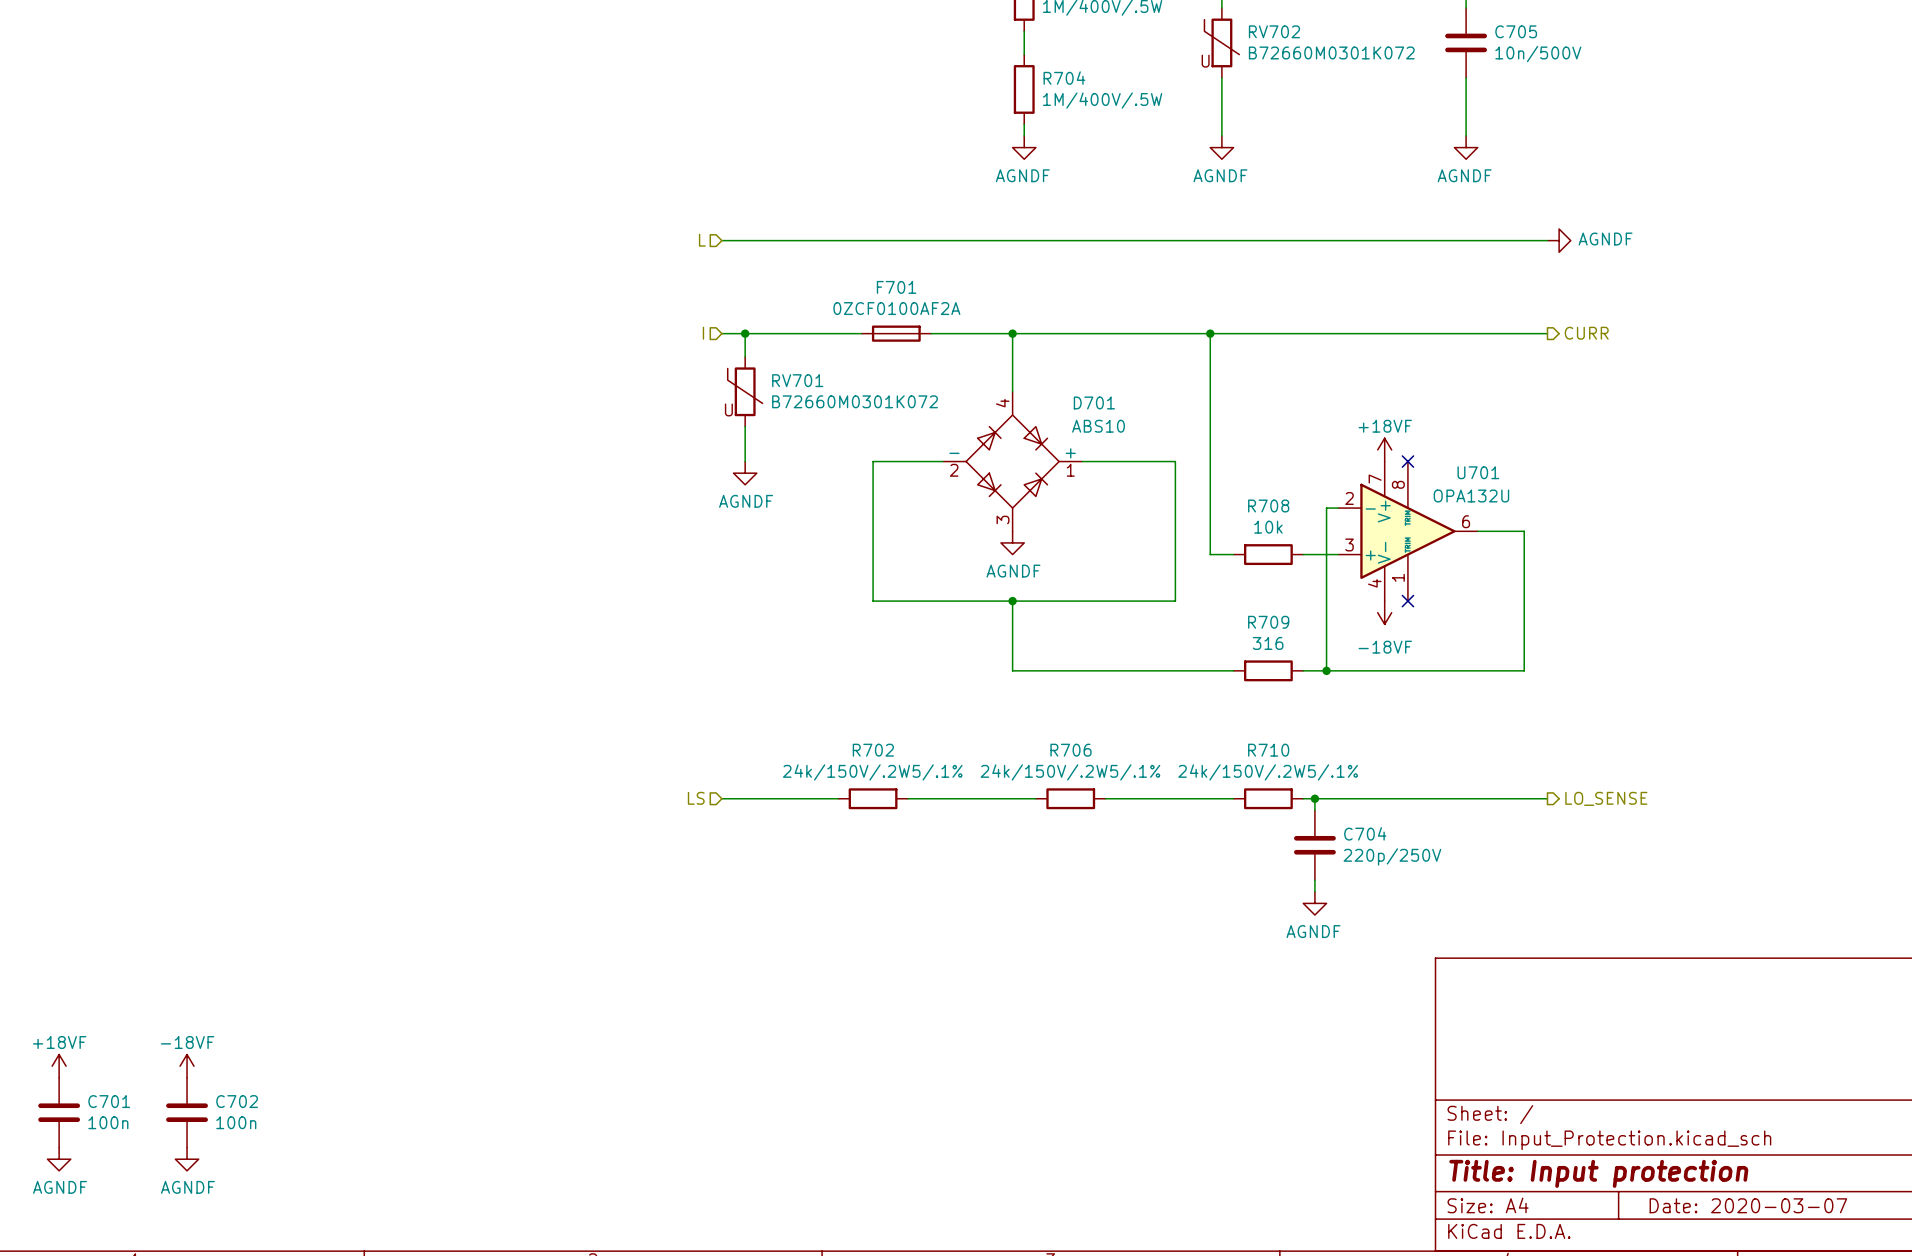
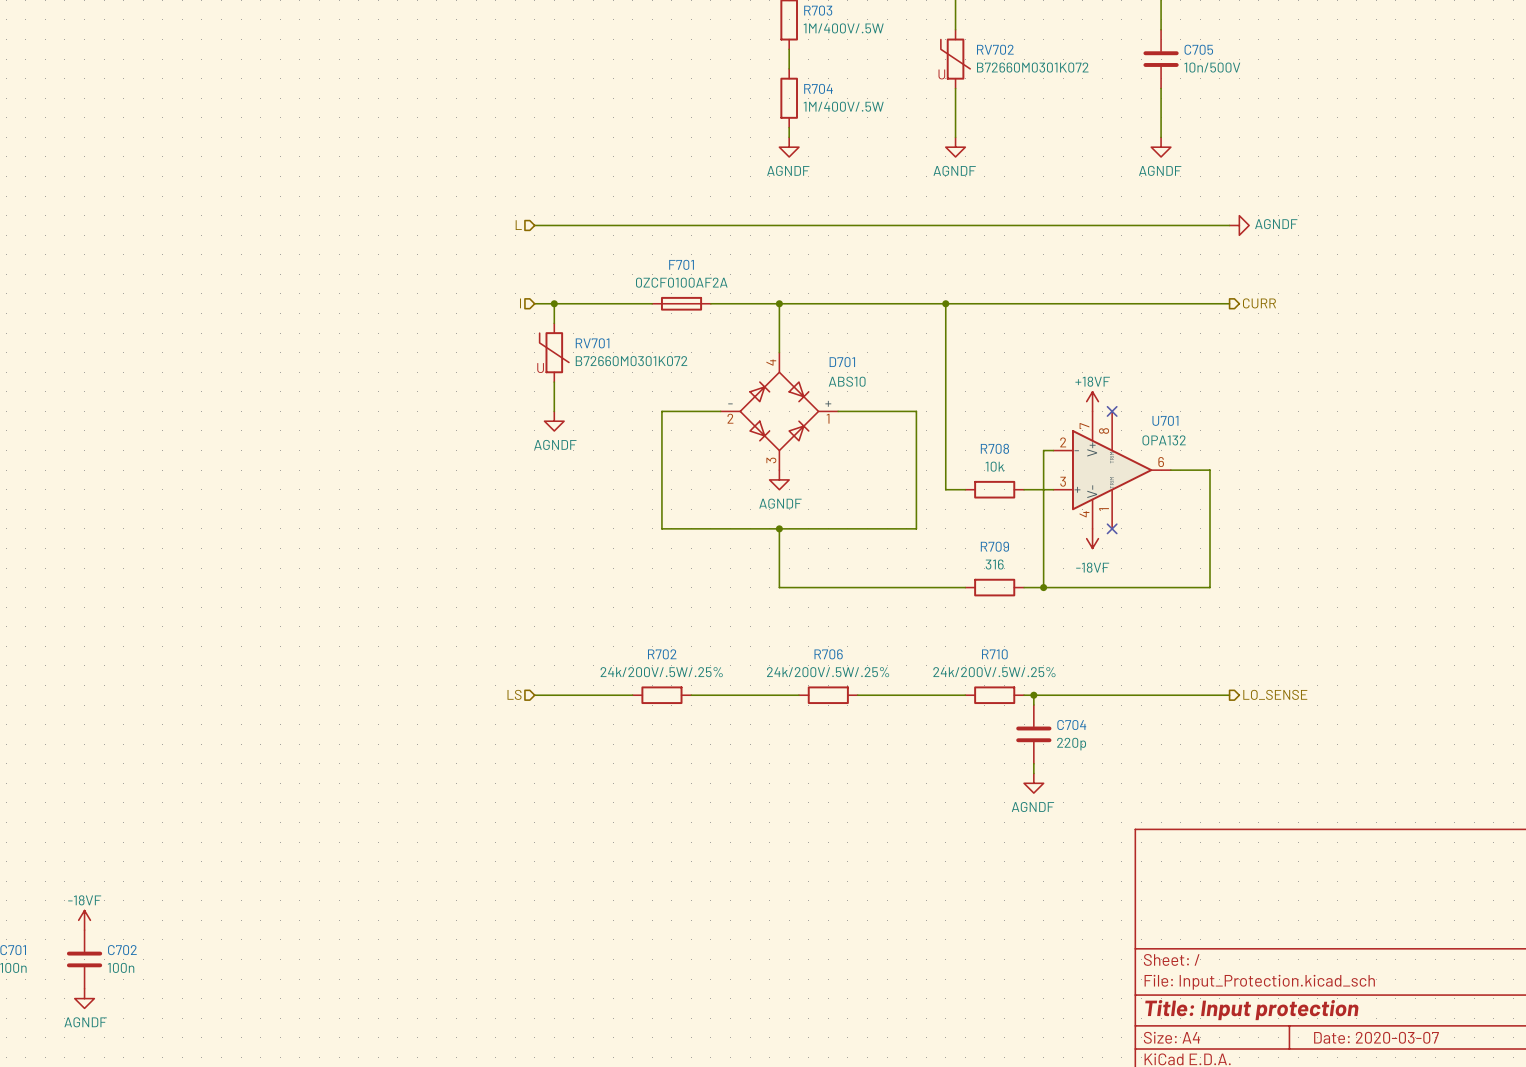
U701 value: OPA132U (1471, 496) -> OPA132 (1164, 440)
R702 value: 24k/150V/.2W5/.1% (872, 772) -> 24k/200V/.5W/.25% (661, 672)
R706 value: 24k/150V/.2W5/.1% (1070, 772) -> 24k/200V/.5W/.25% (828, 672)
R710 value: 24k/150V/.2W5/.1% (1268, 772) -> 24k/200V/.5W/.25% (994, 672)
C704 value: 220p/250V (1392, 856) -> 220p (1071, 744)

